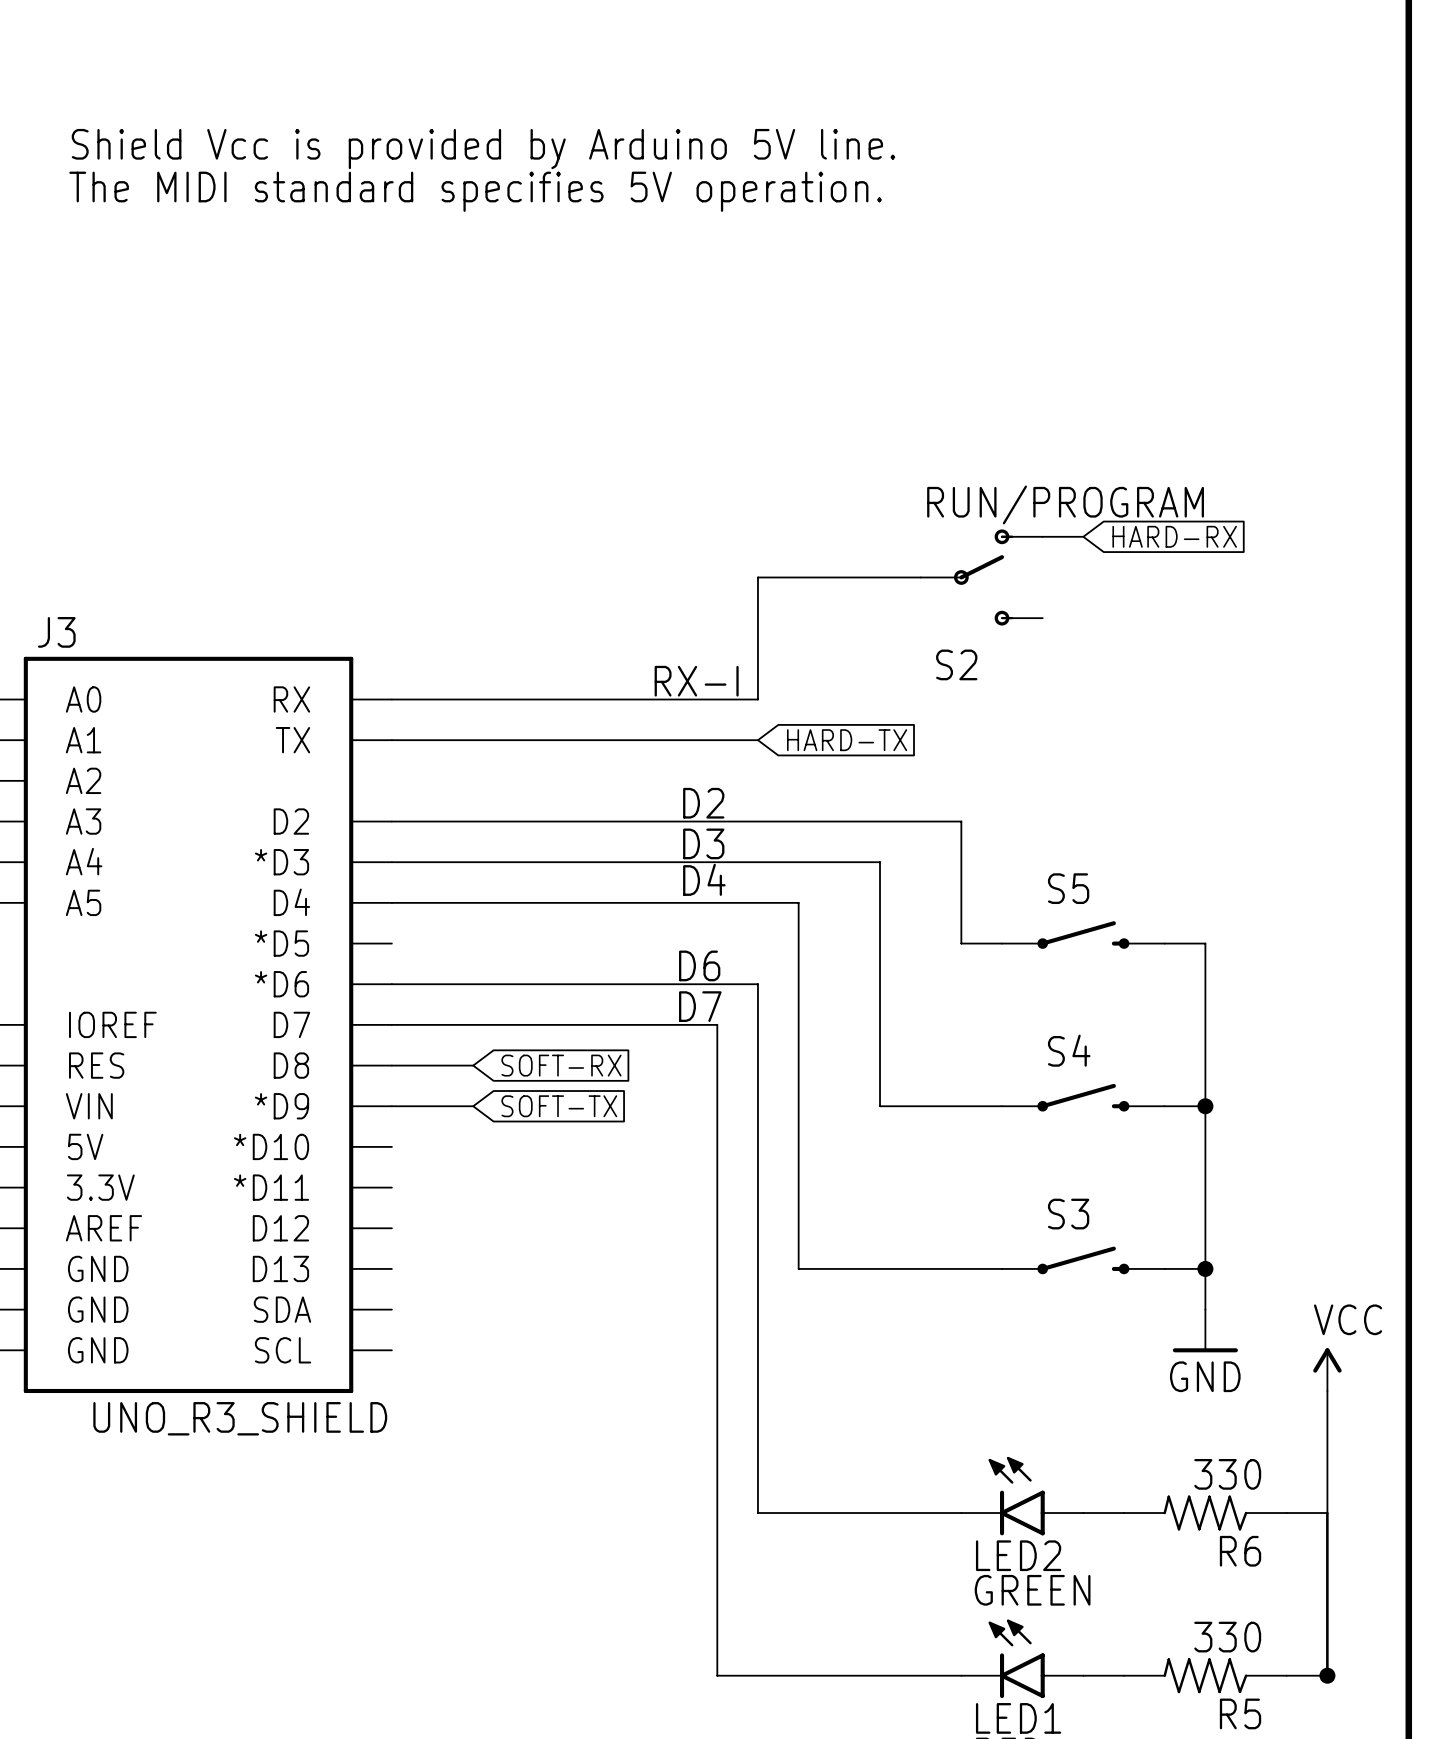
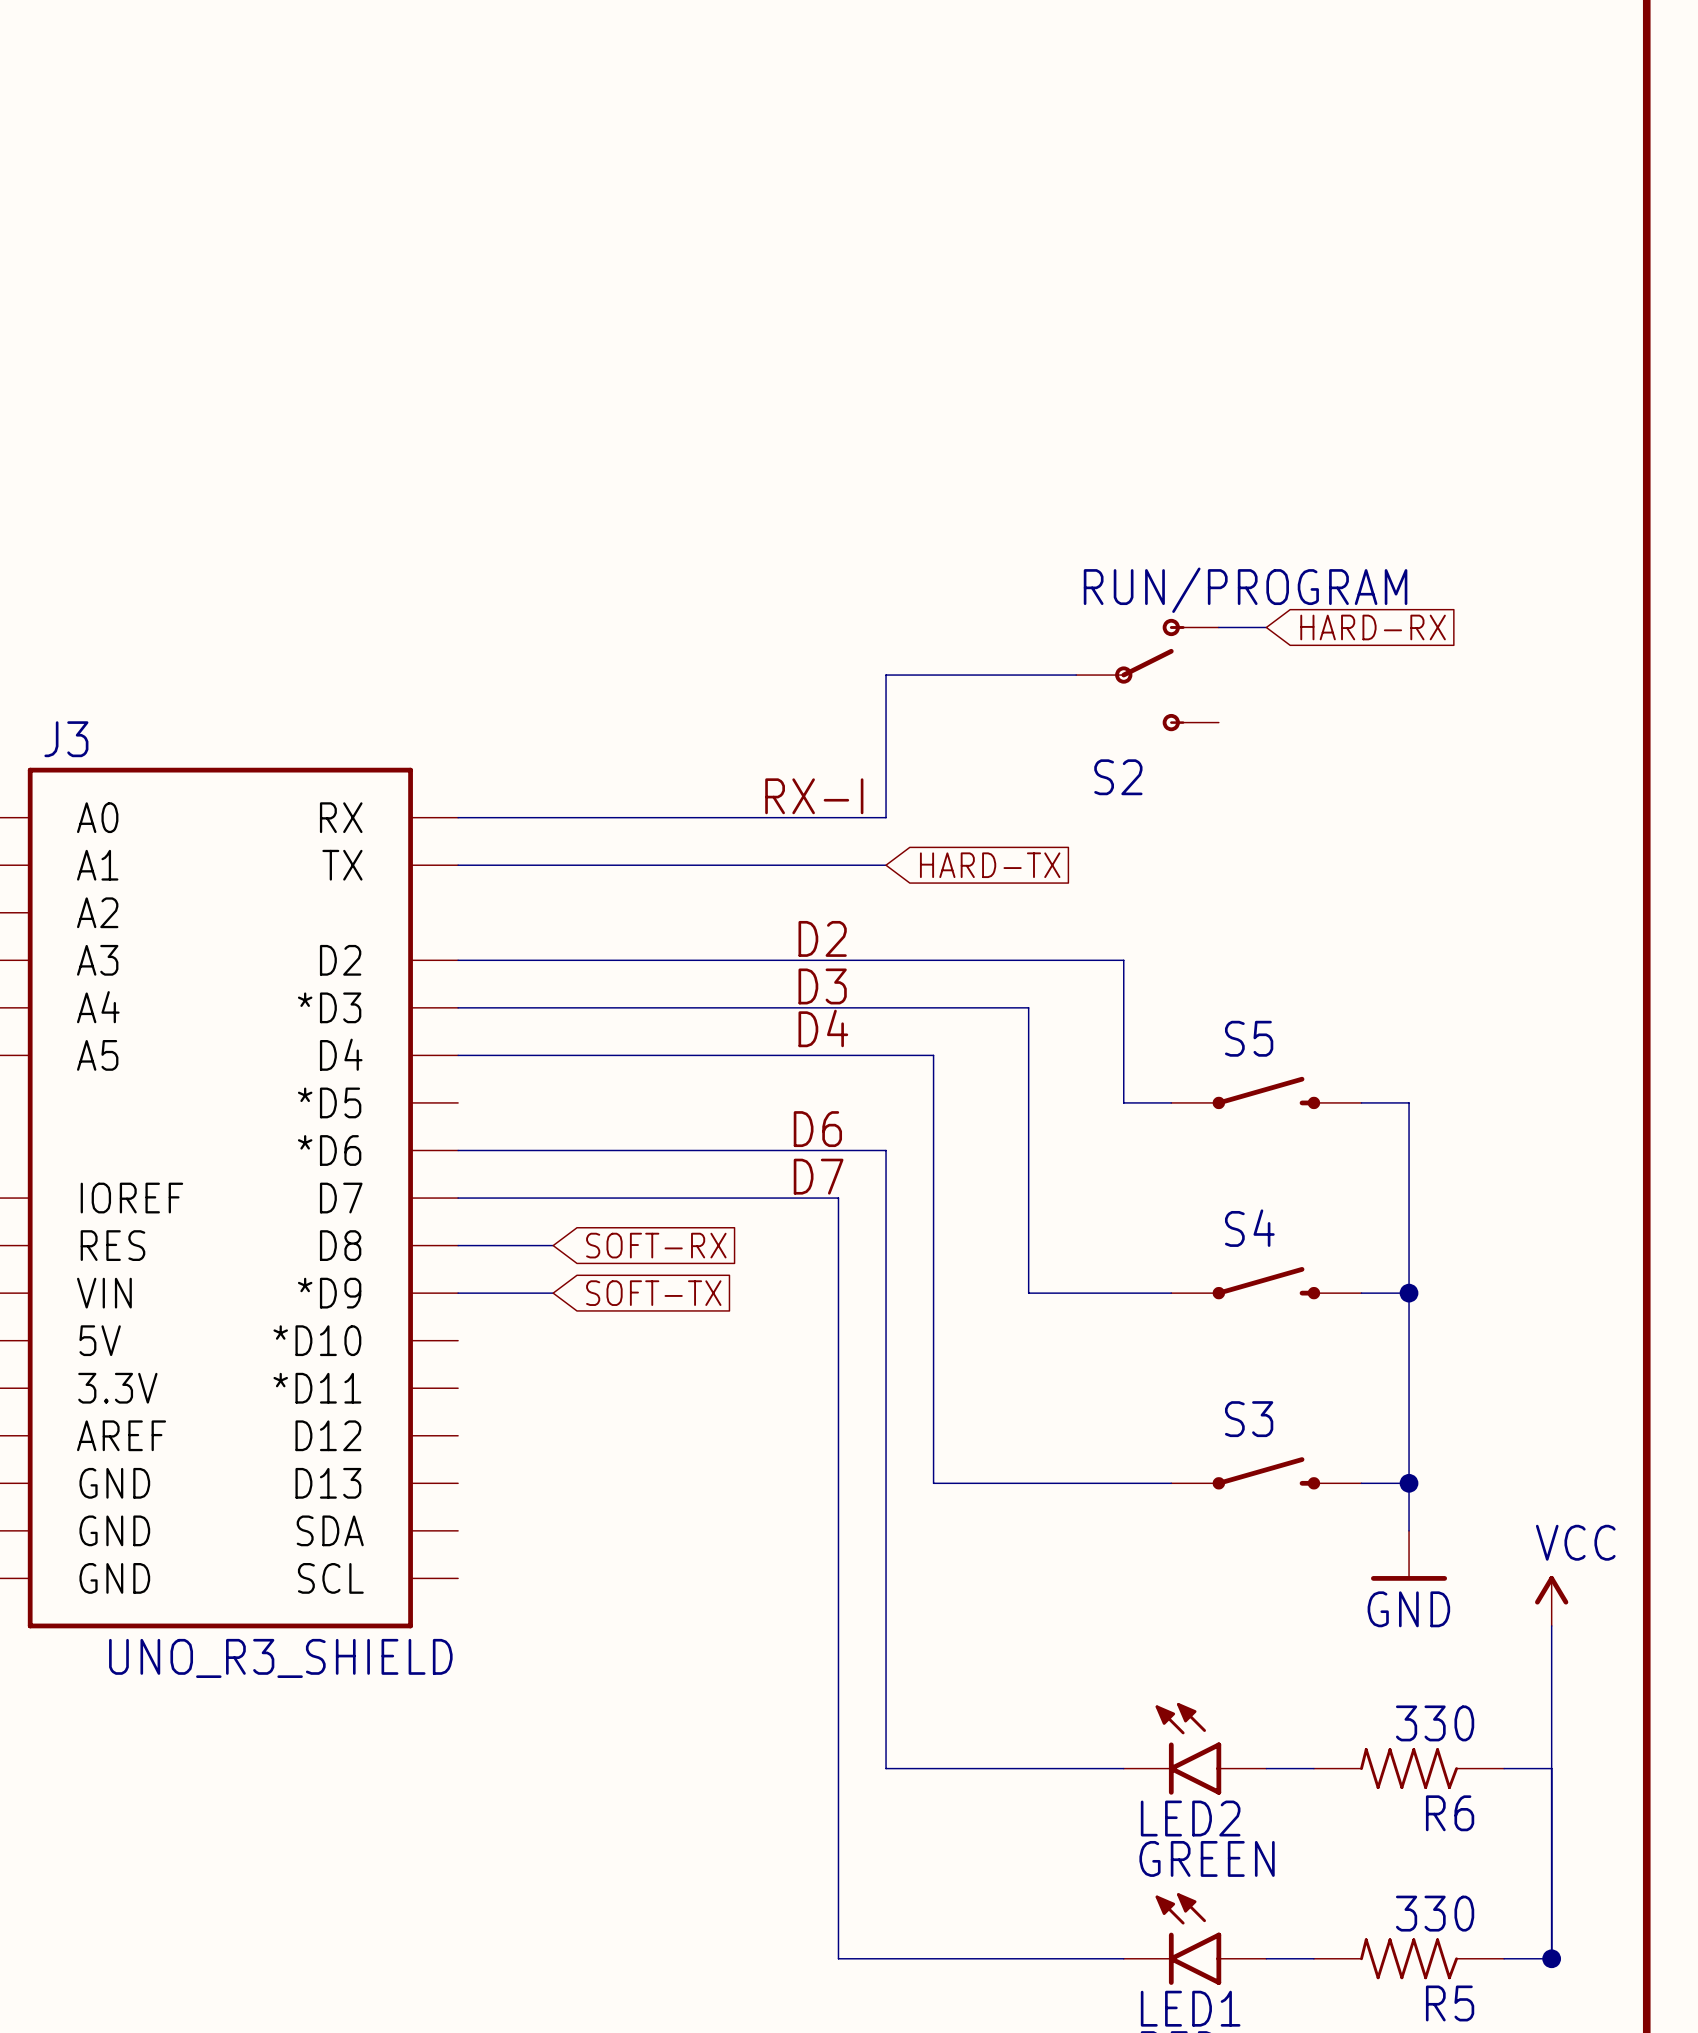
text: Shield Vcc is provided by Arduino 5V line. (483, 149) -> none
text: The MIDI standard specifies 5V operation. (475, 191) -> none

